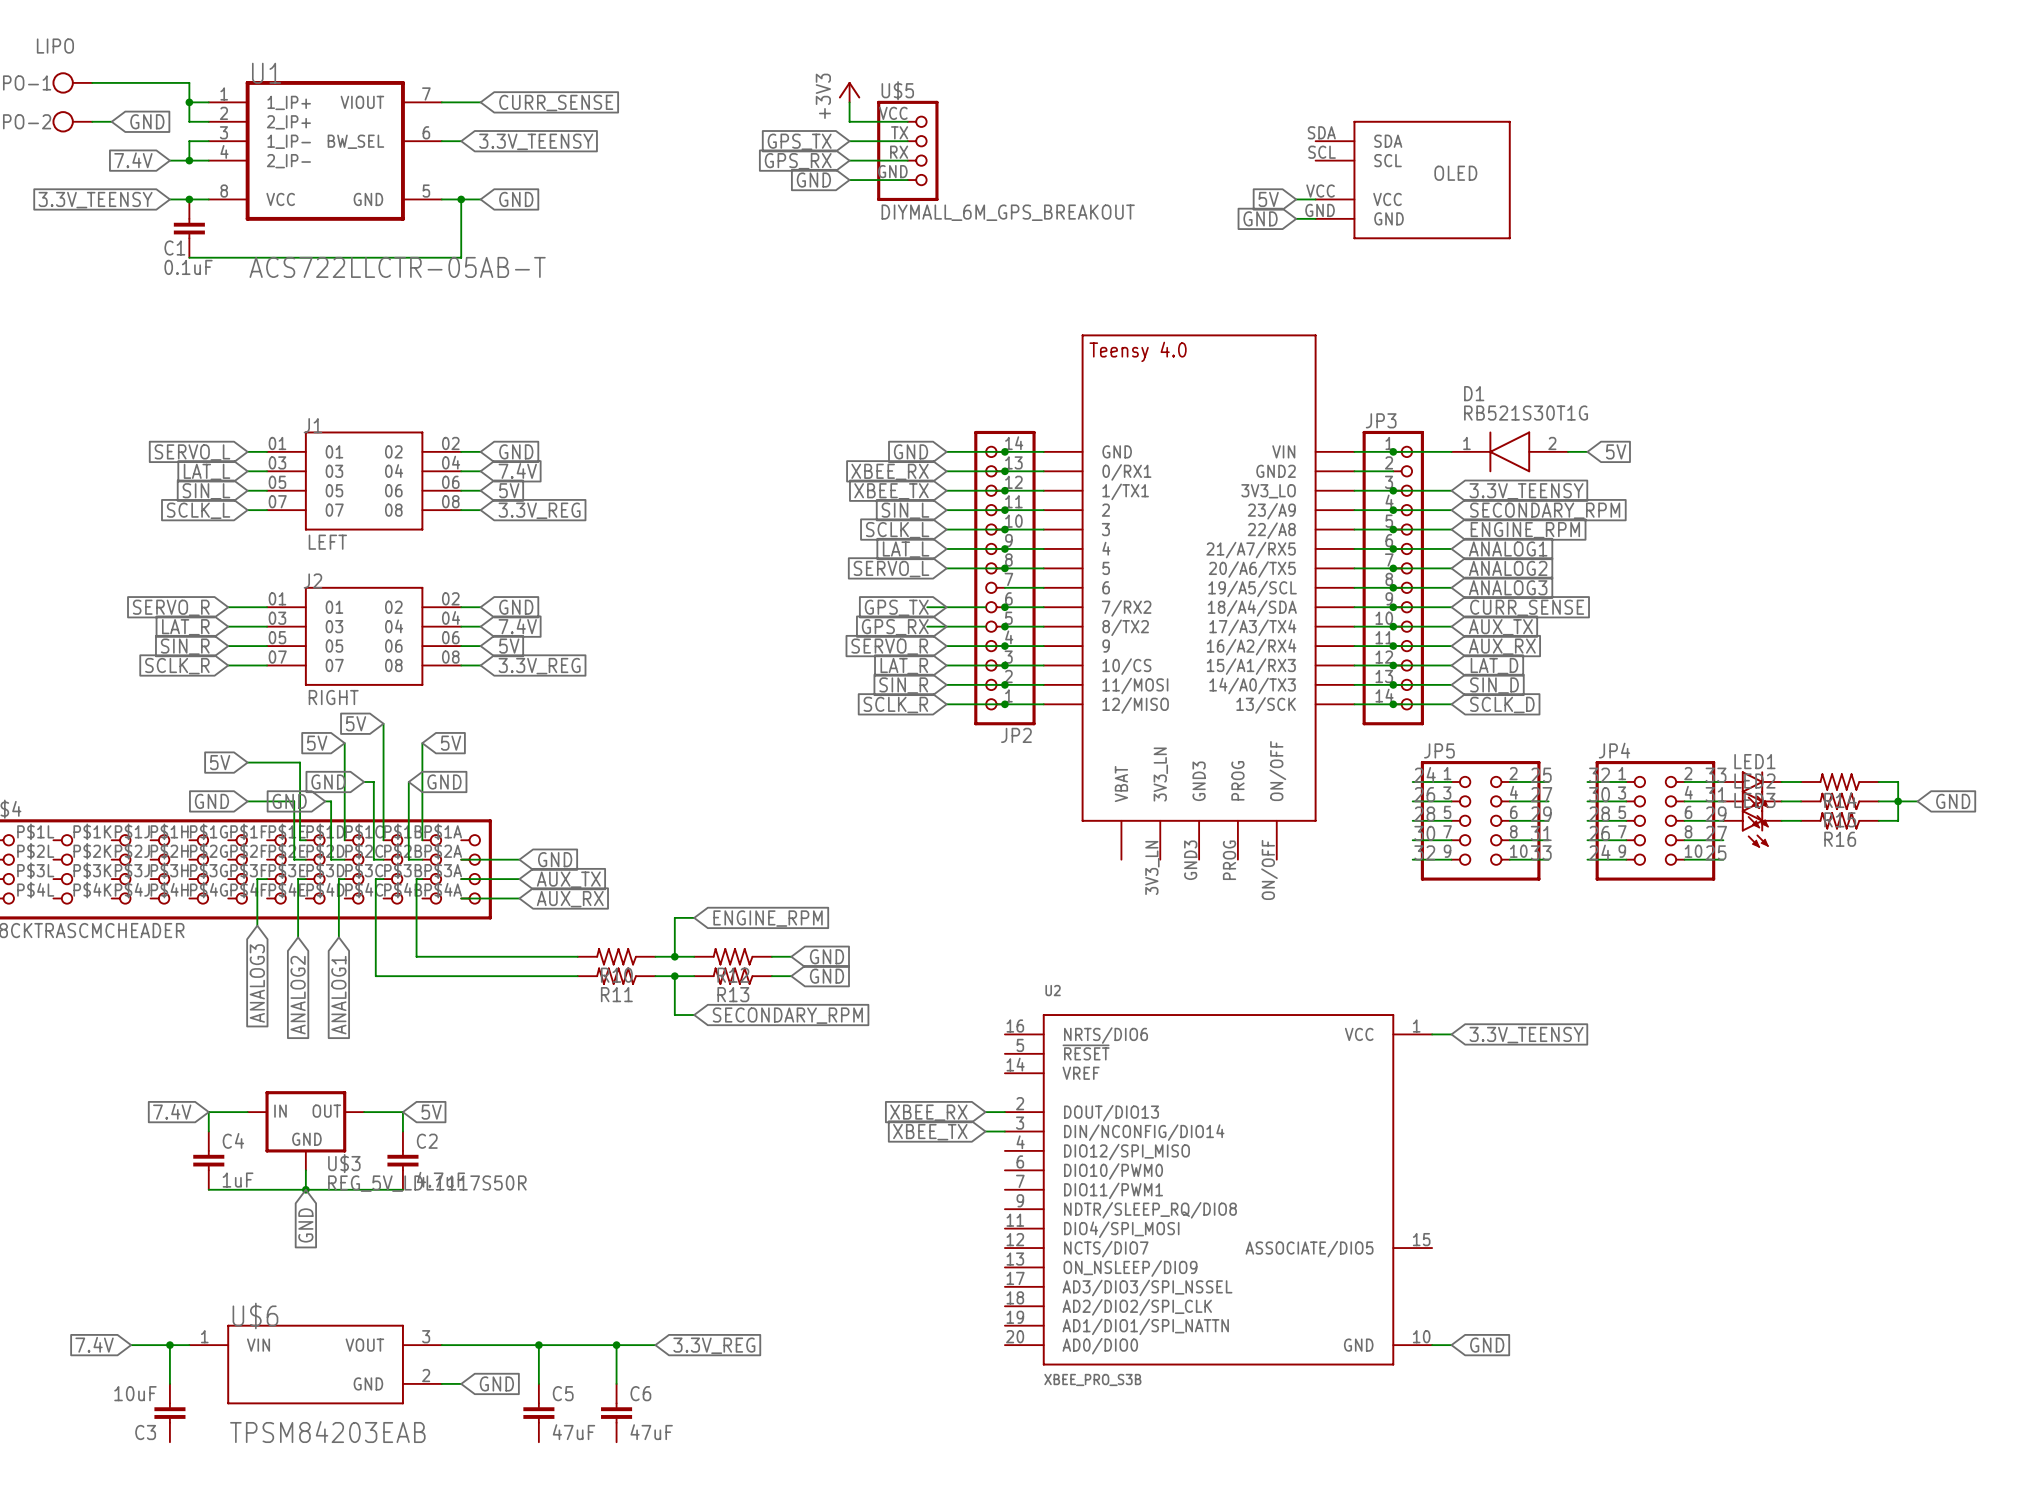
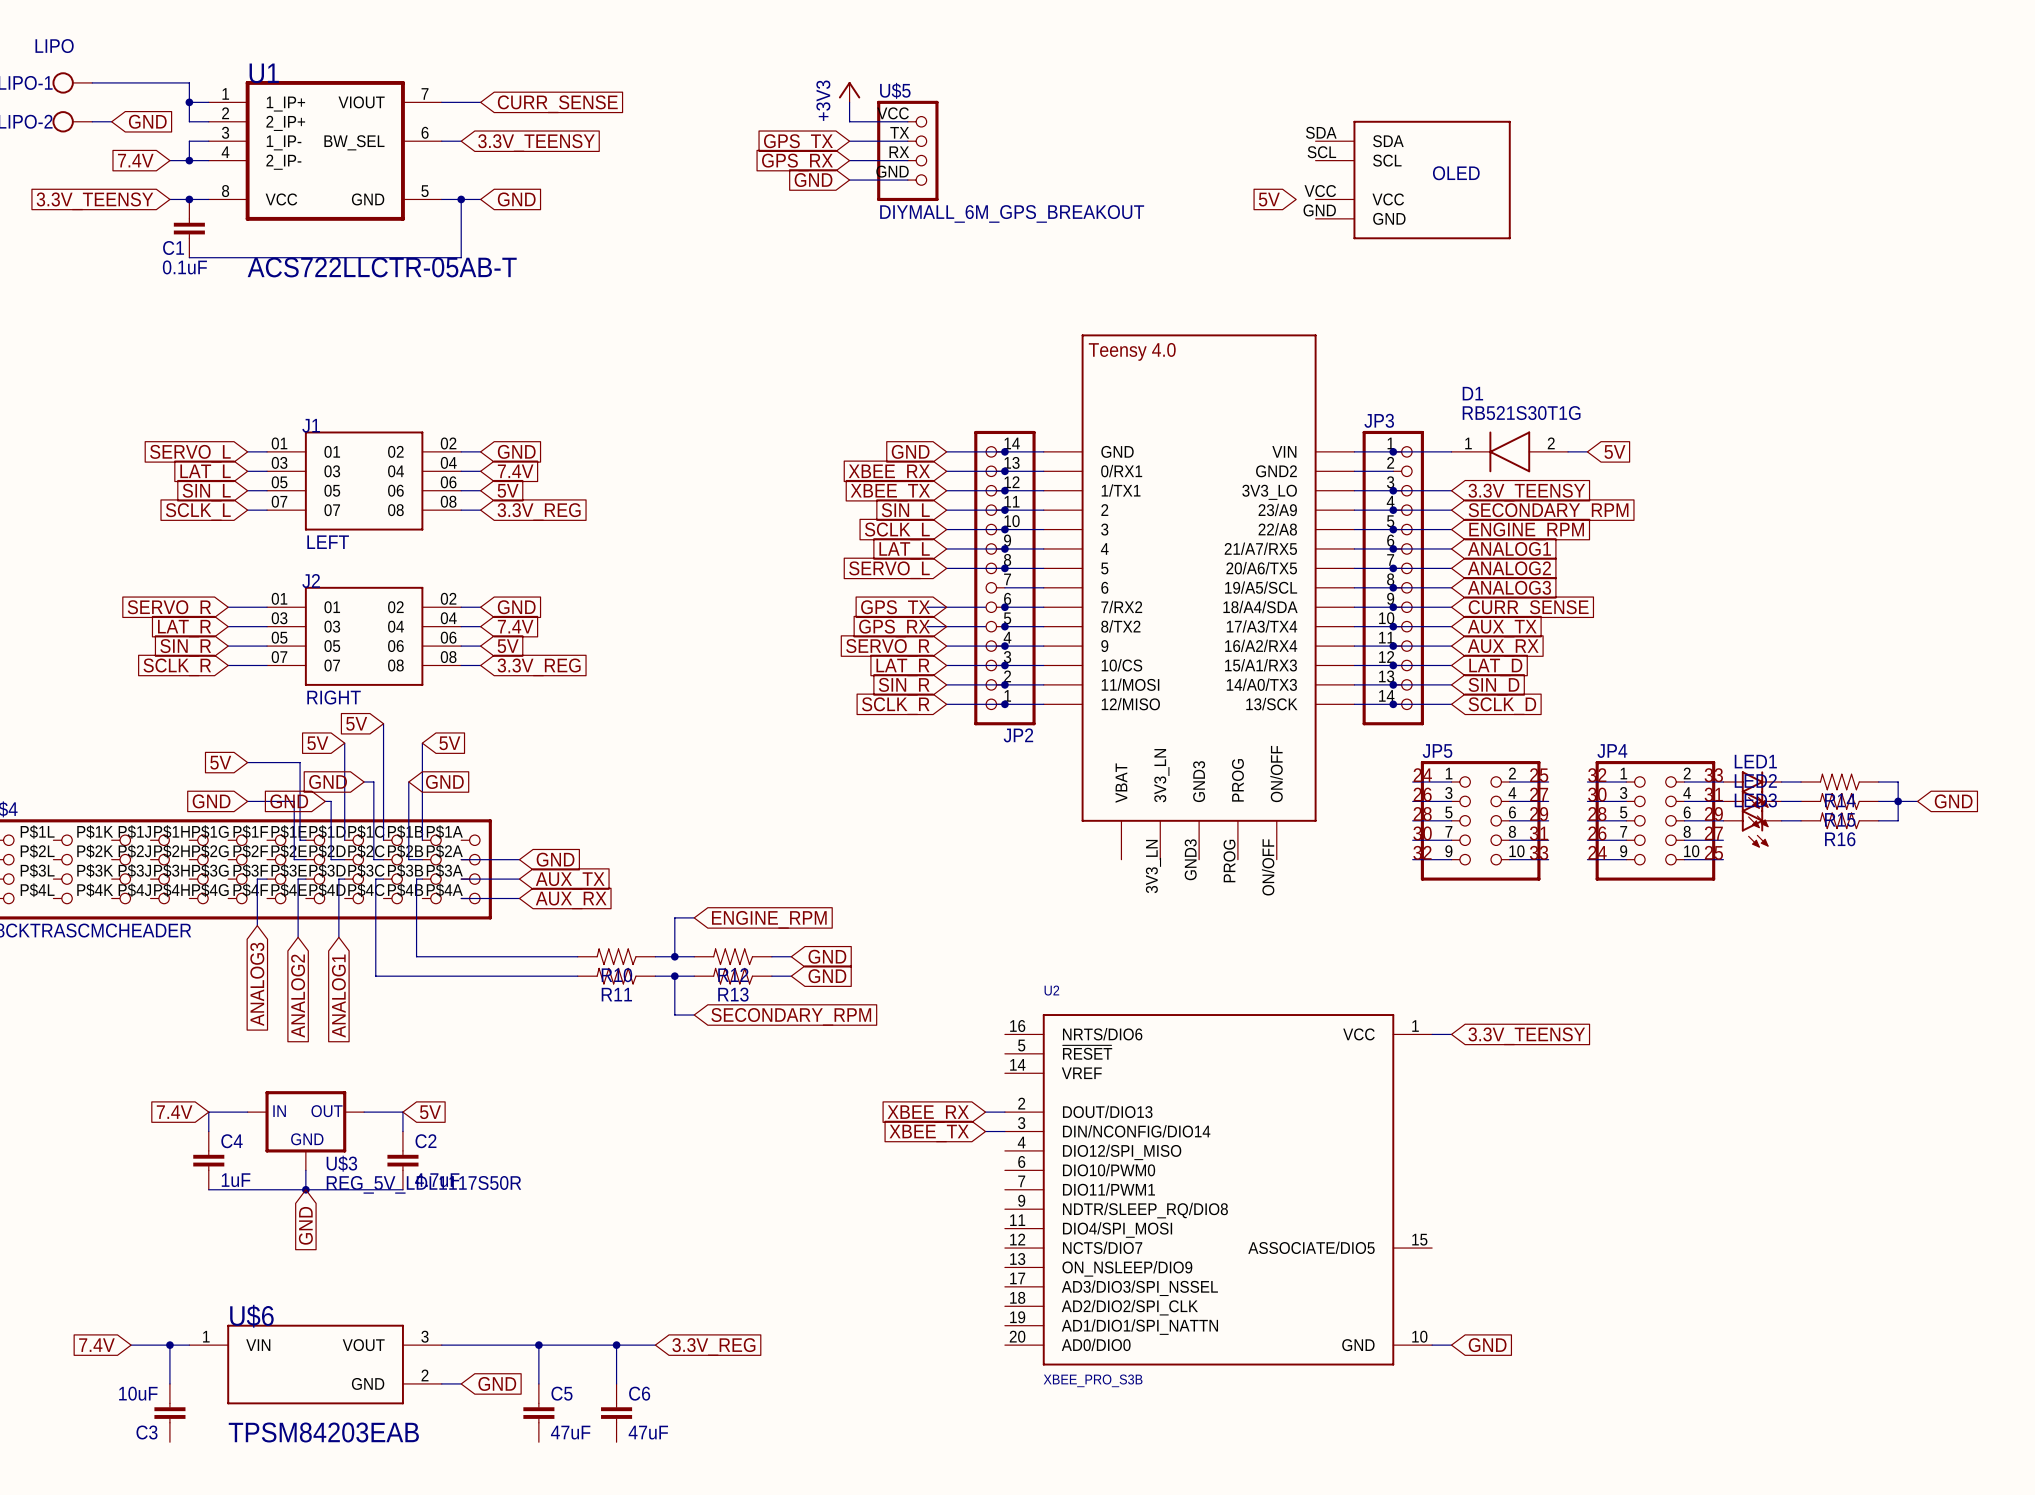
wire: (1296, 199) (1315, 199) -> none
global label: GND (1260, 218) -> none
wire: (1296, 218) (1315, 218) -> none

